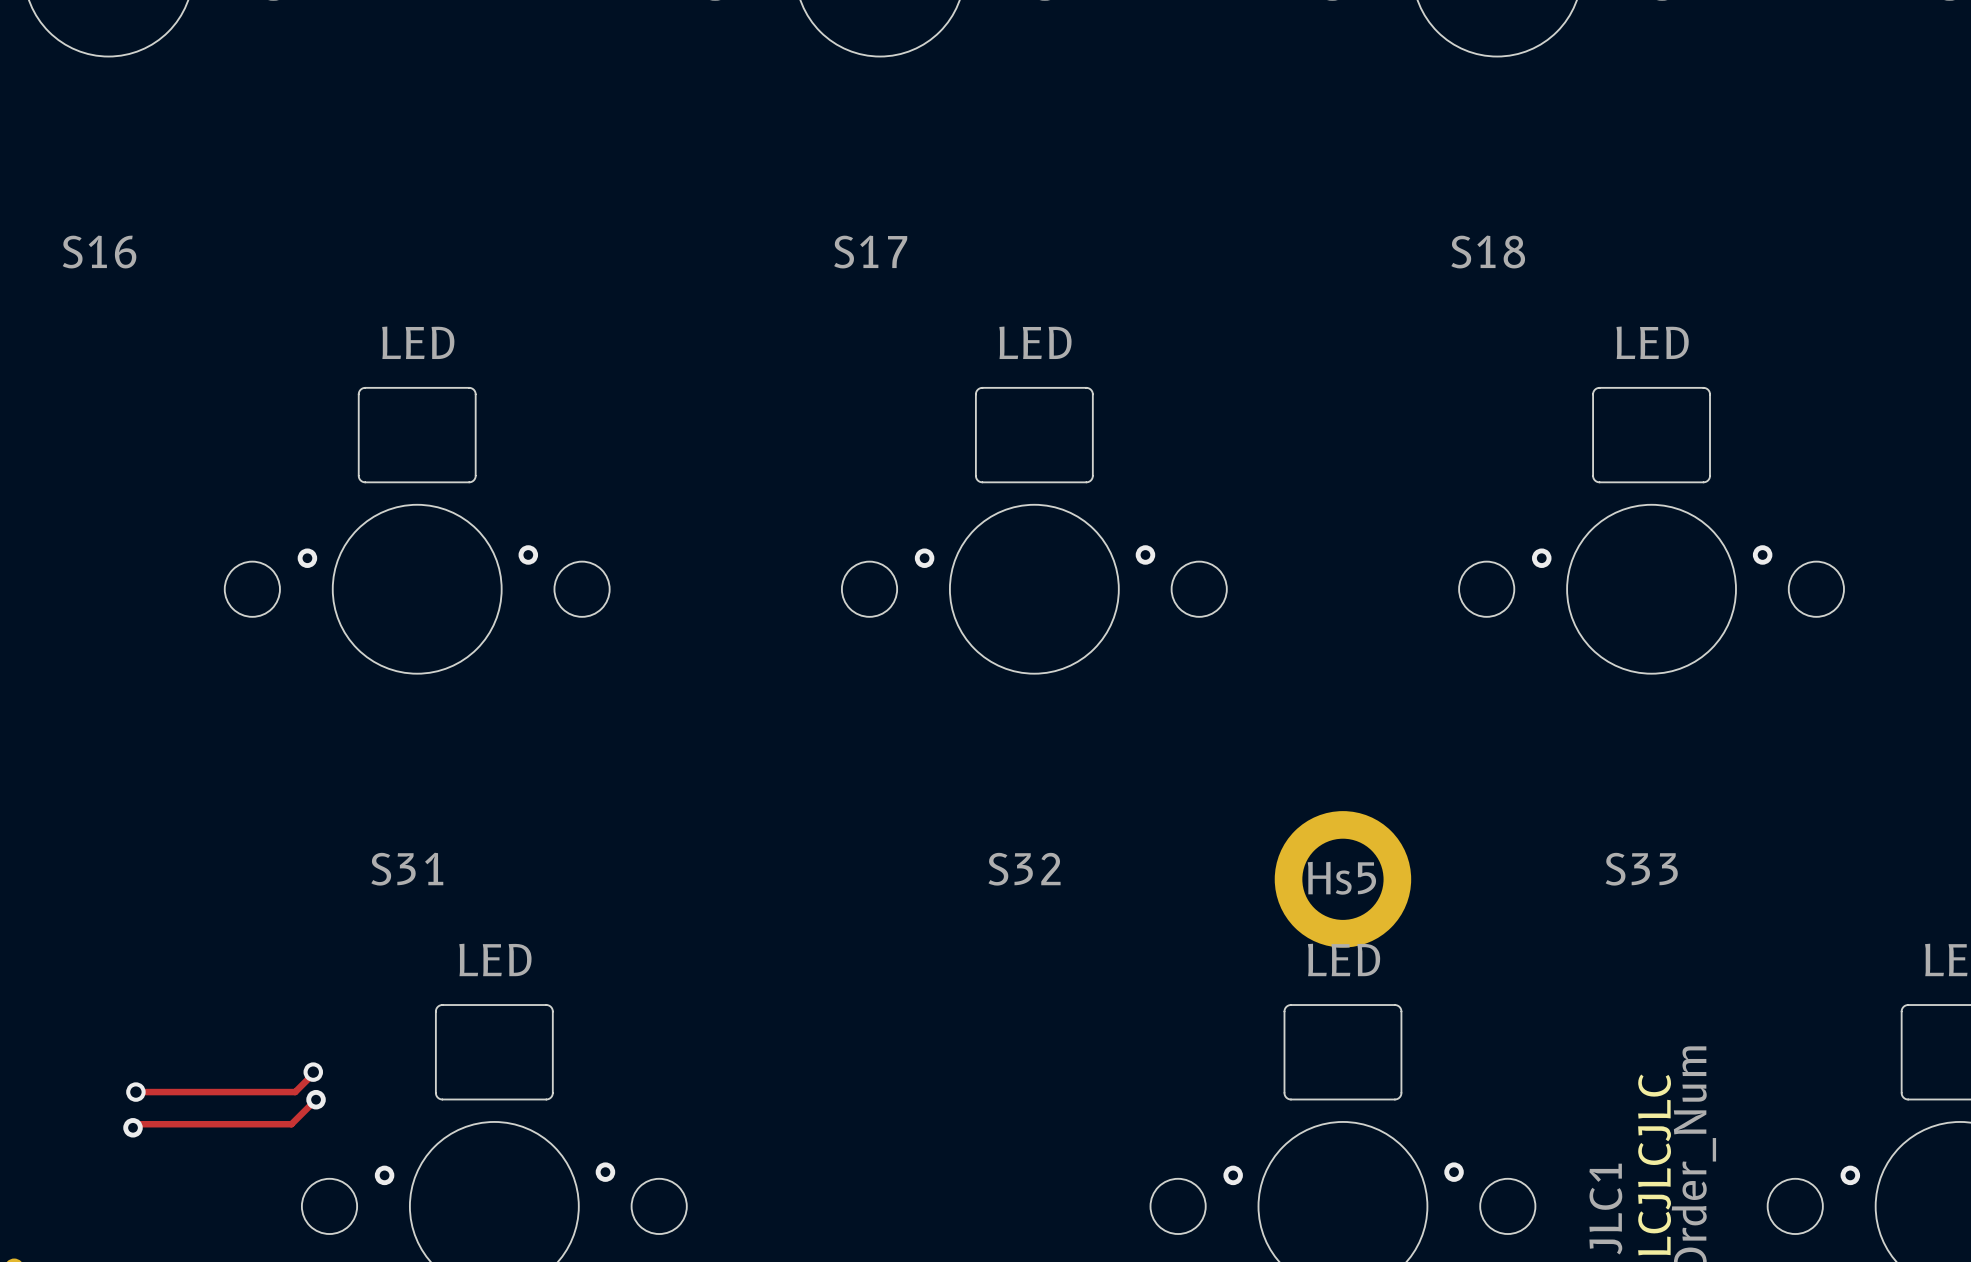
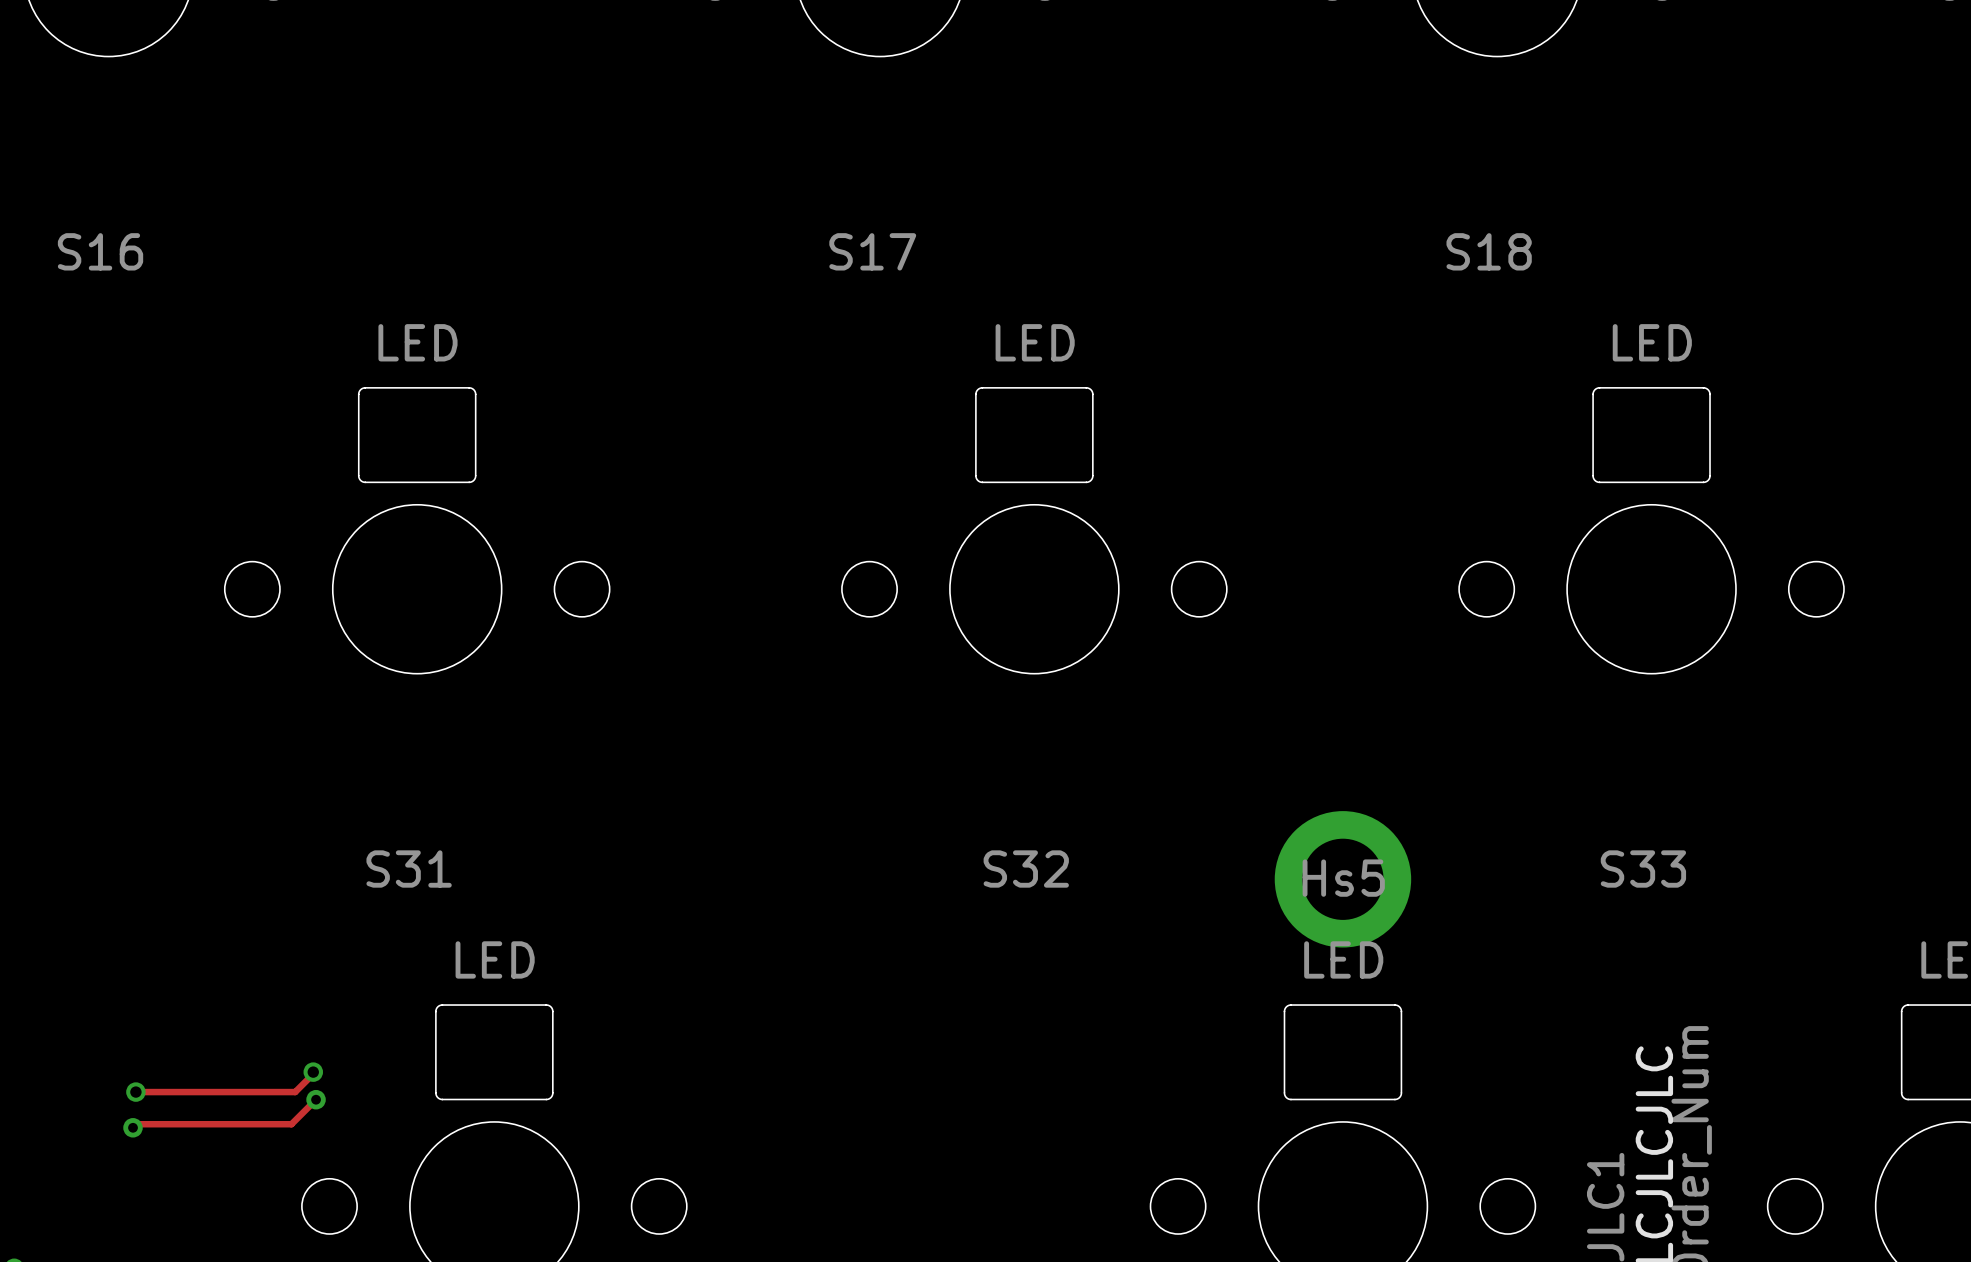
via: (528, 554) -> none
via: (1145, 554) -> none
via: (1762, 554) -> none
via: (307, 558) -> none
via: (924, 558) -> none
via: (1541, 558) -> none
via: (605, 1172) -> none
via: (1454, 1172) -> none
via: (384, 1175) -> none
via: (1233, 1175) -> none
via: (1850, 1175) -> none

